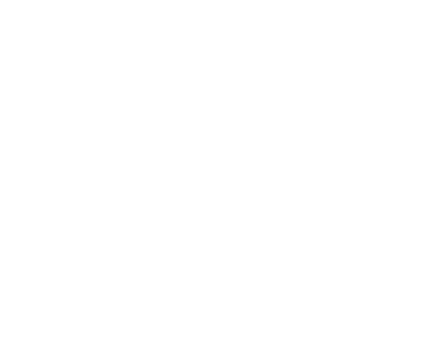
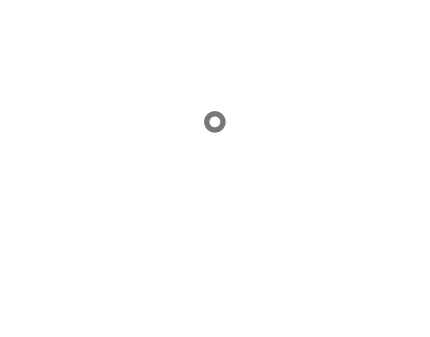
via: none -> (214, 121)

